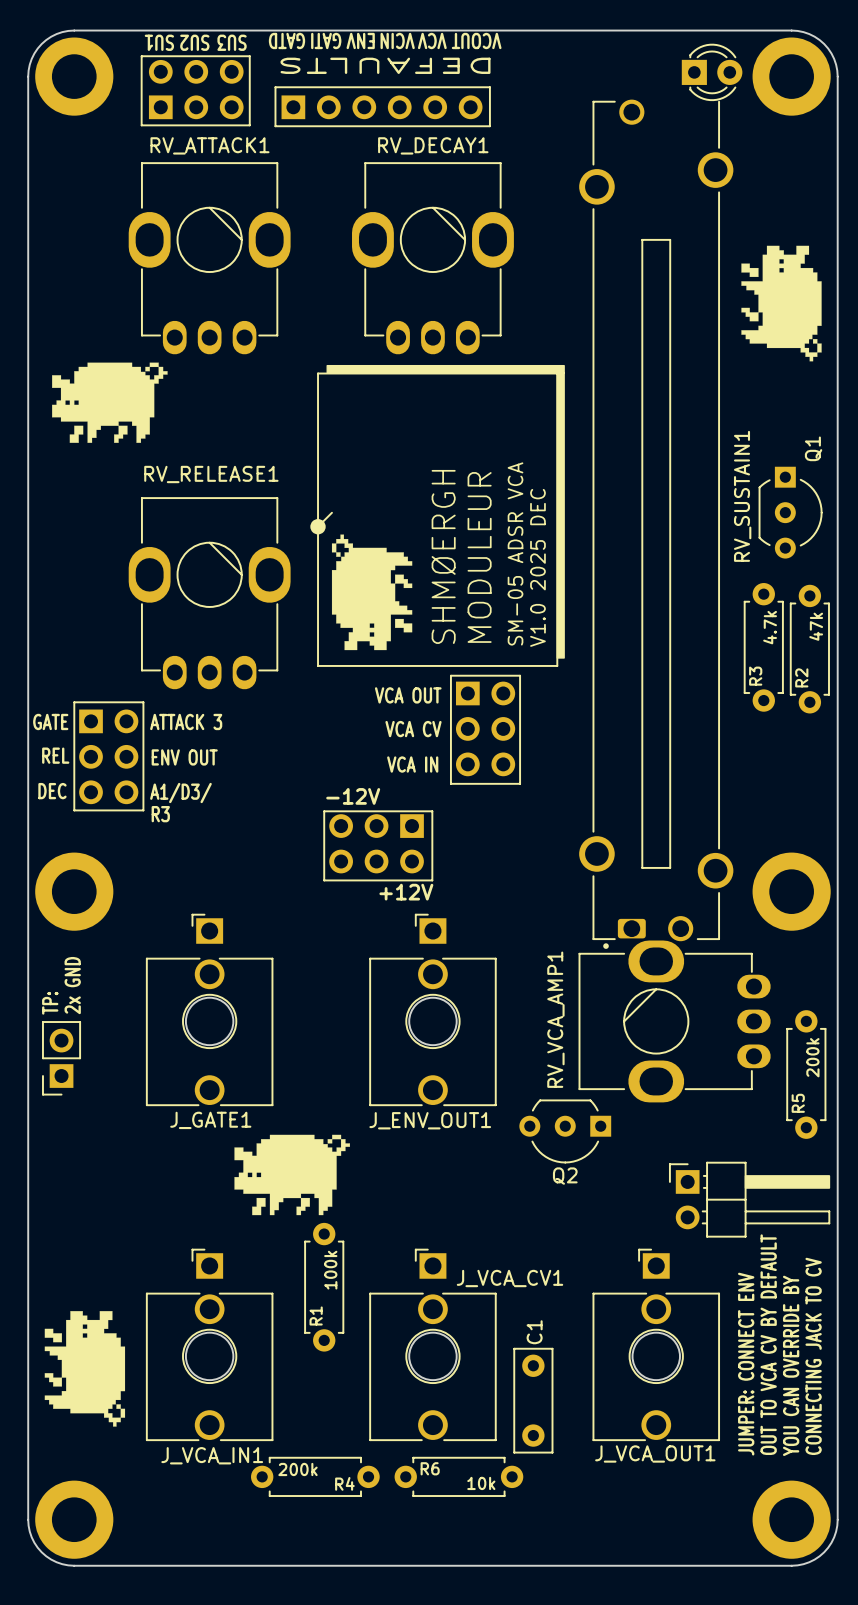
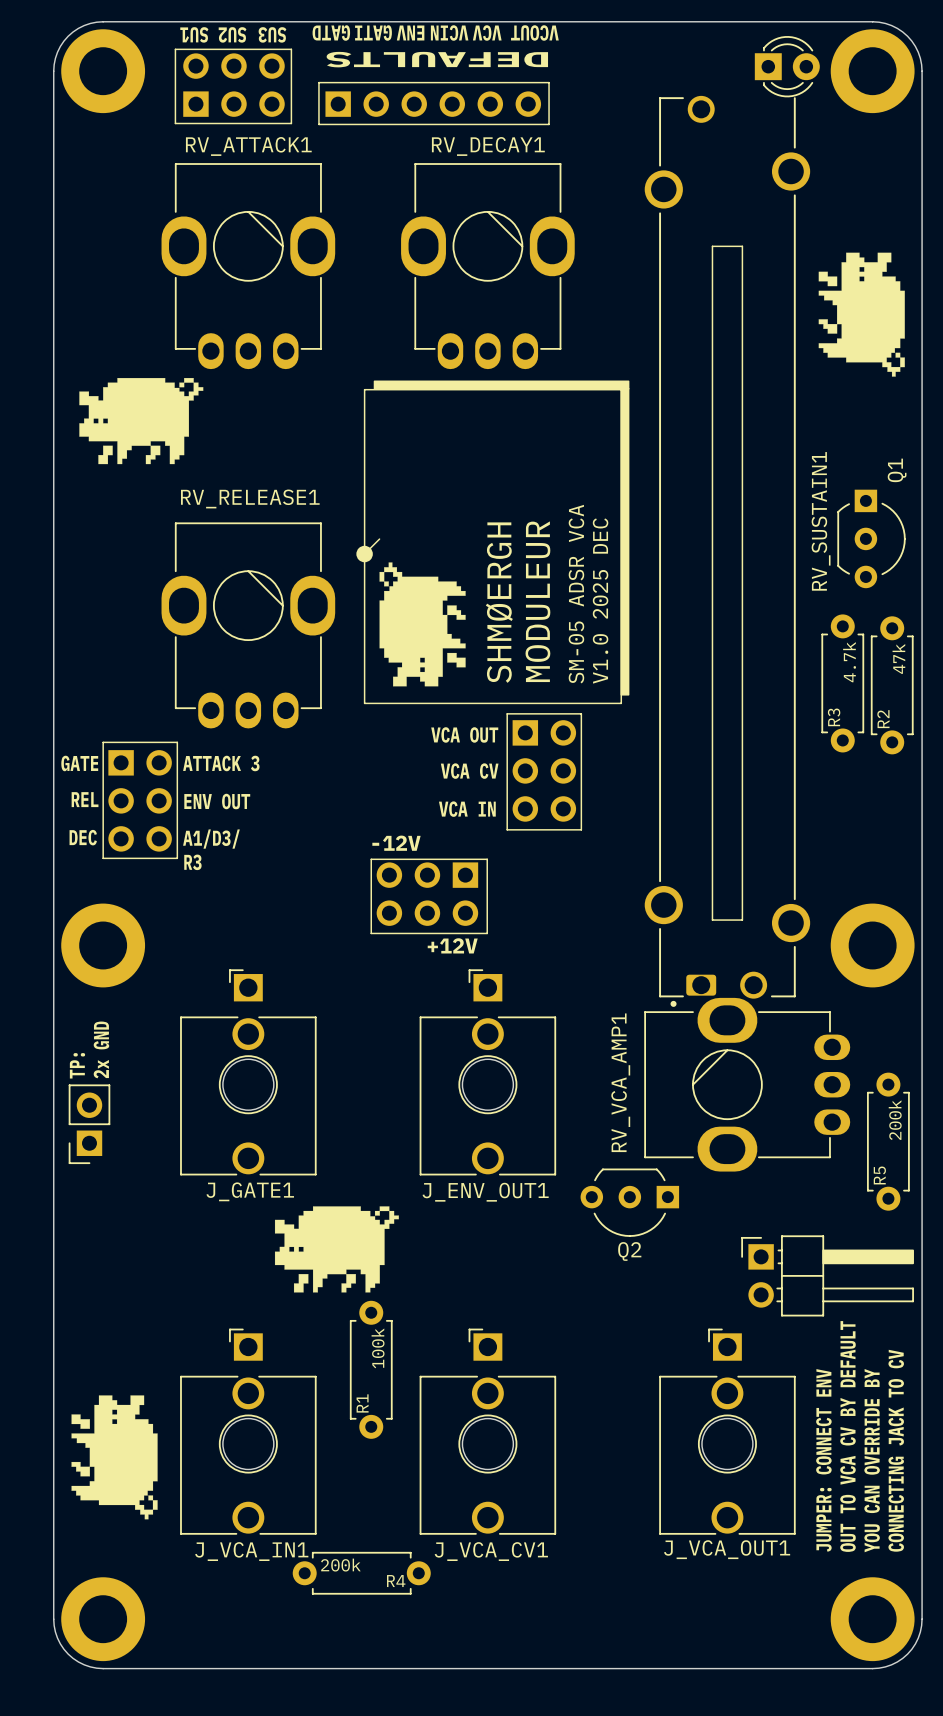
J_VCA_CV1 name position: J_VCA_CV1 (509, 1278) -> J_VCA_CV1 (491, 1551)
C1: (533, 1400) -> none
R6: 10k (458, 1476) -> none

